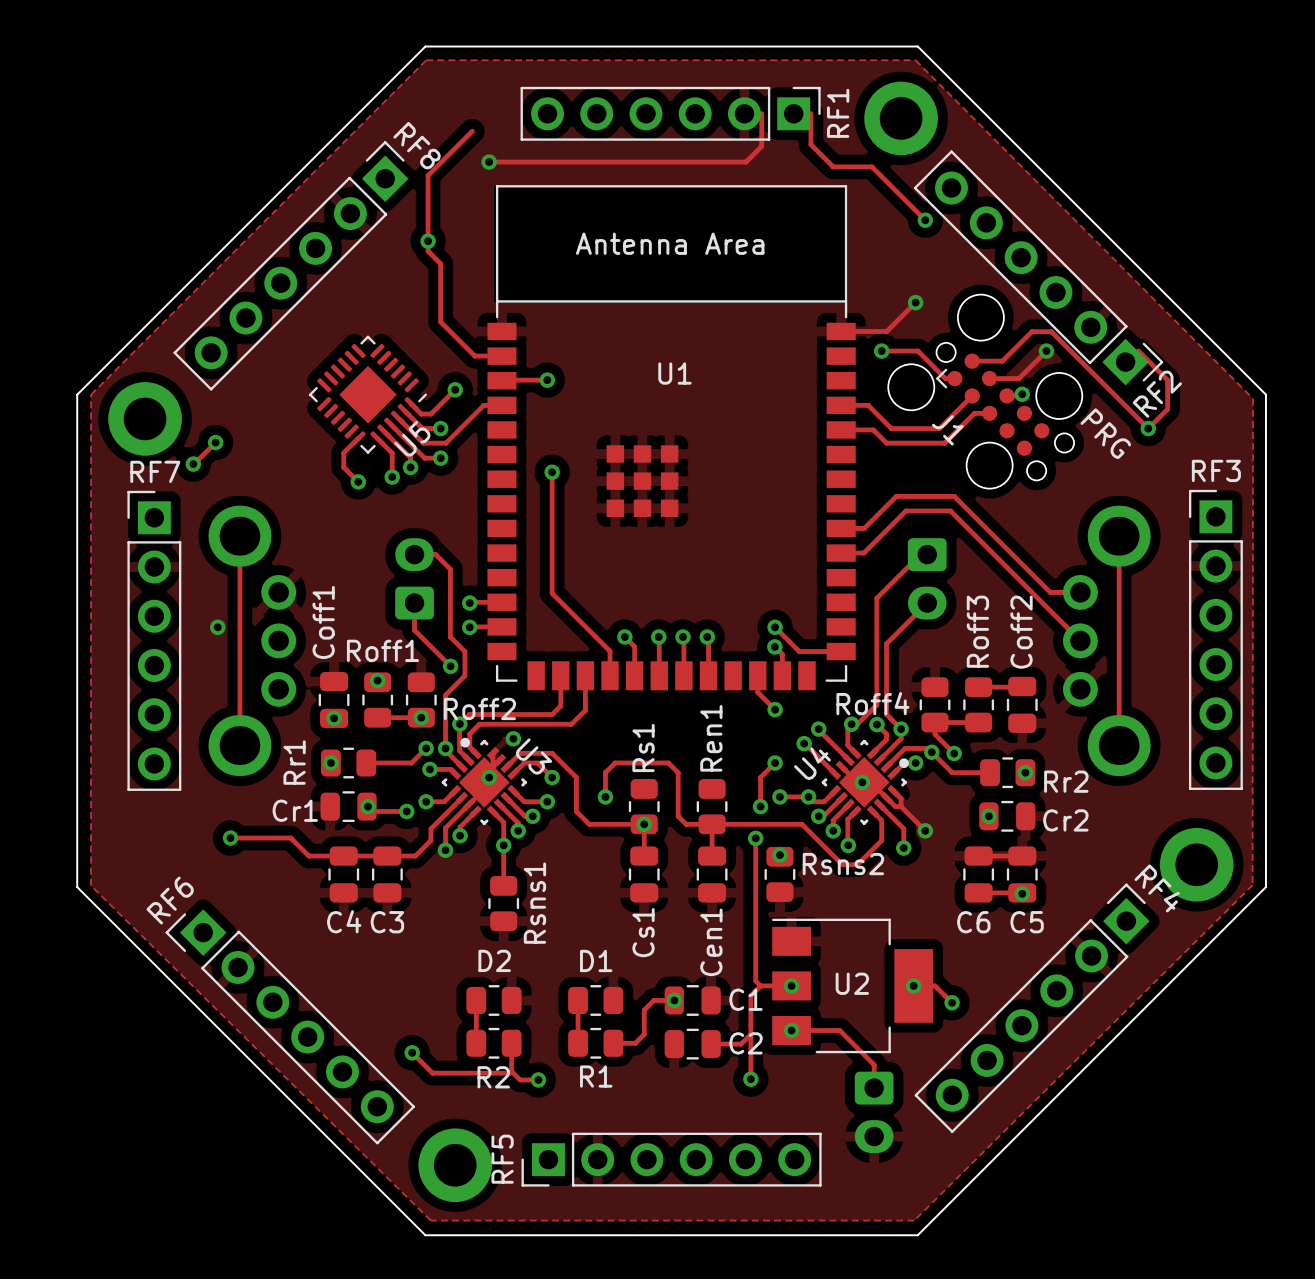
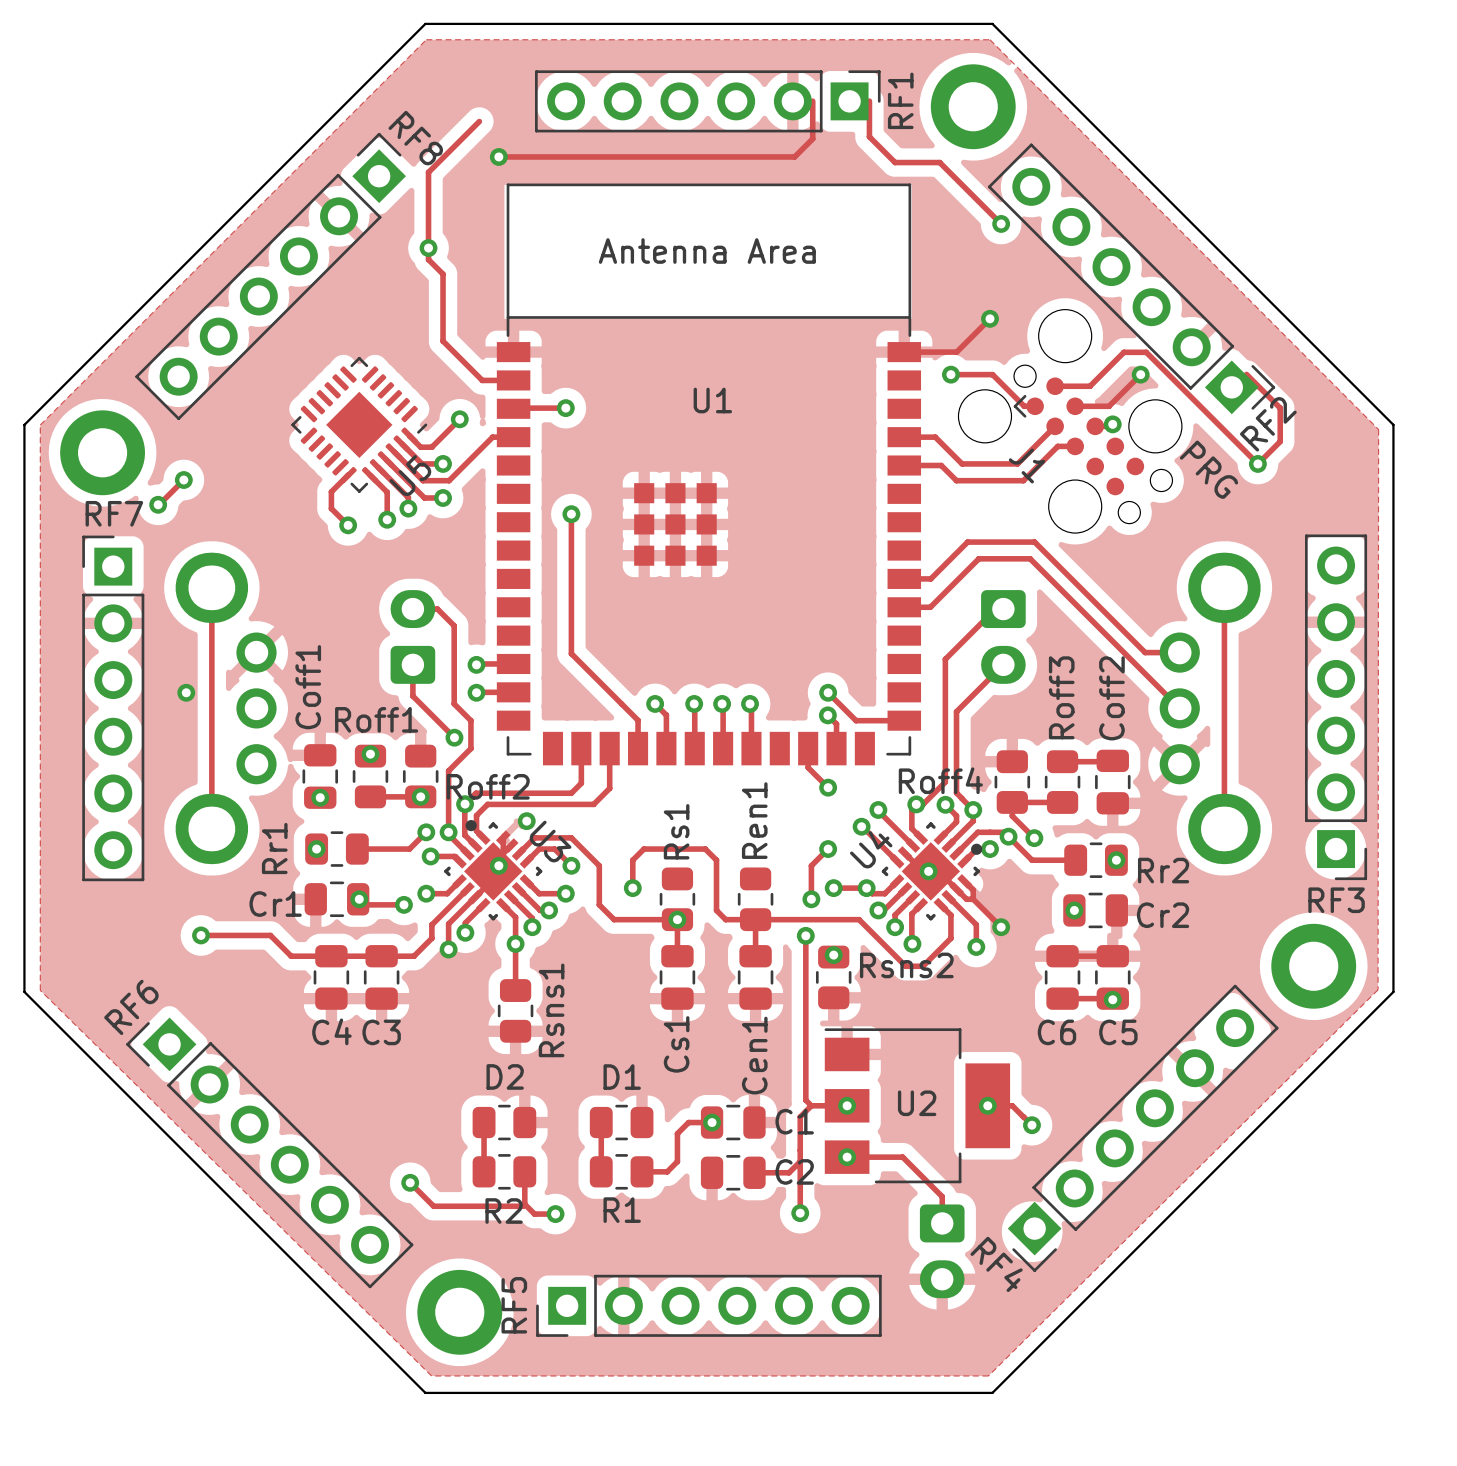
RF3 rotation: 0° (1215, 639) -> 180° (1336, 707)
RF4 rotation: 0° (1032, 1008) -> 180° (1143, 1128)

